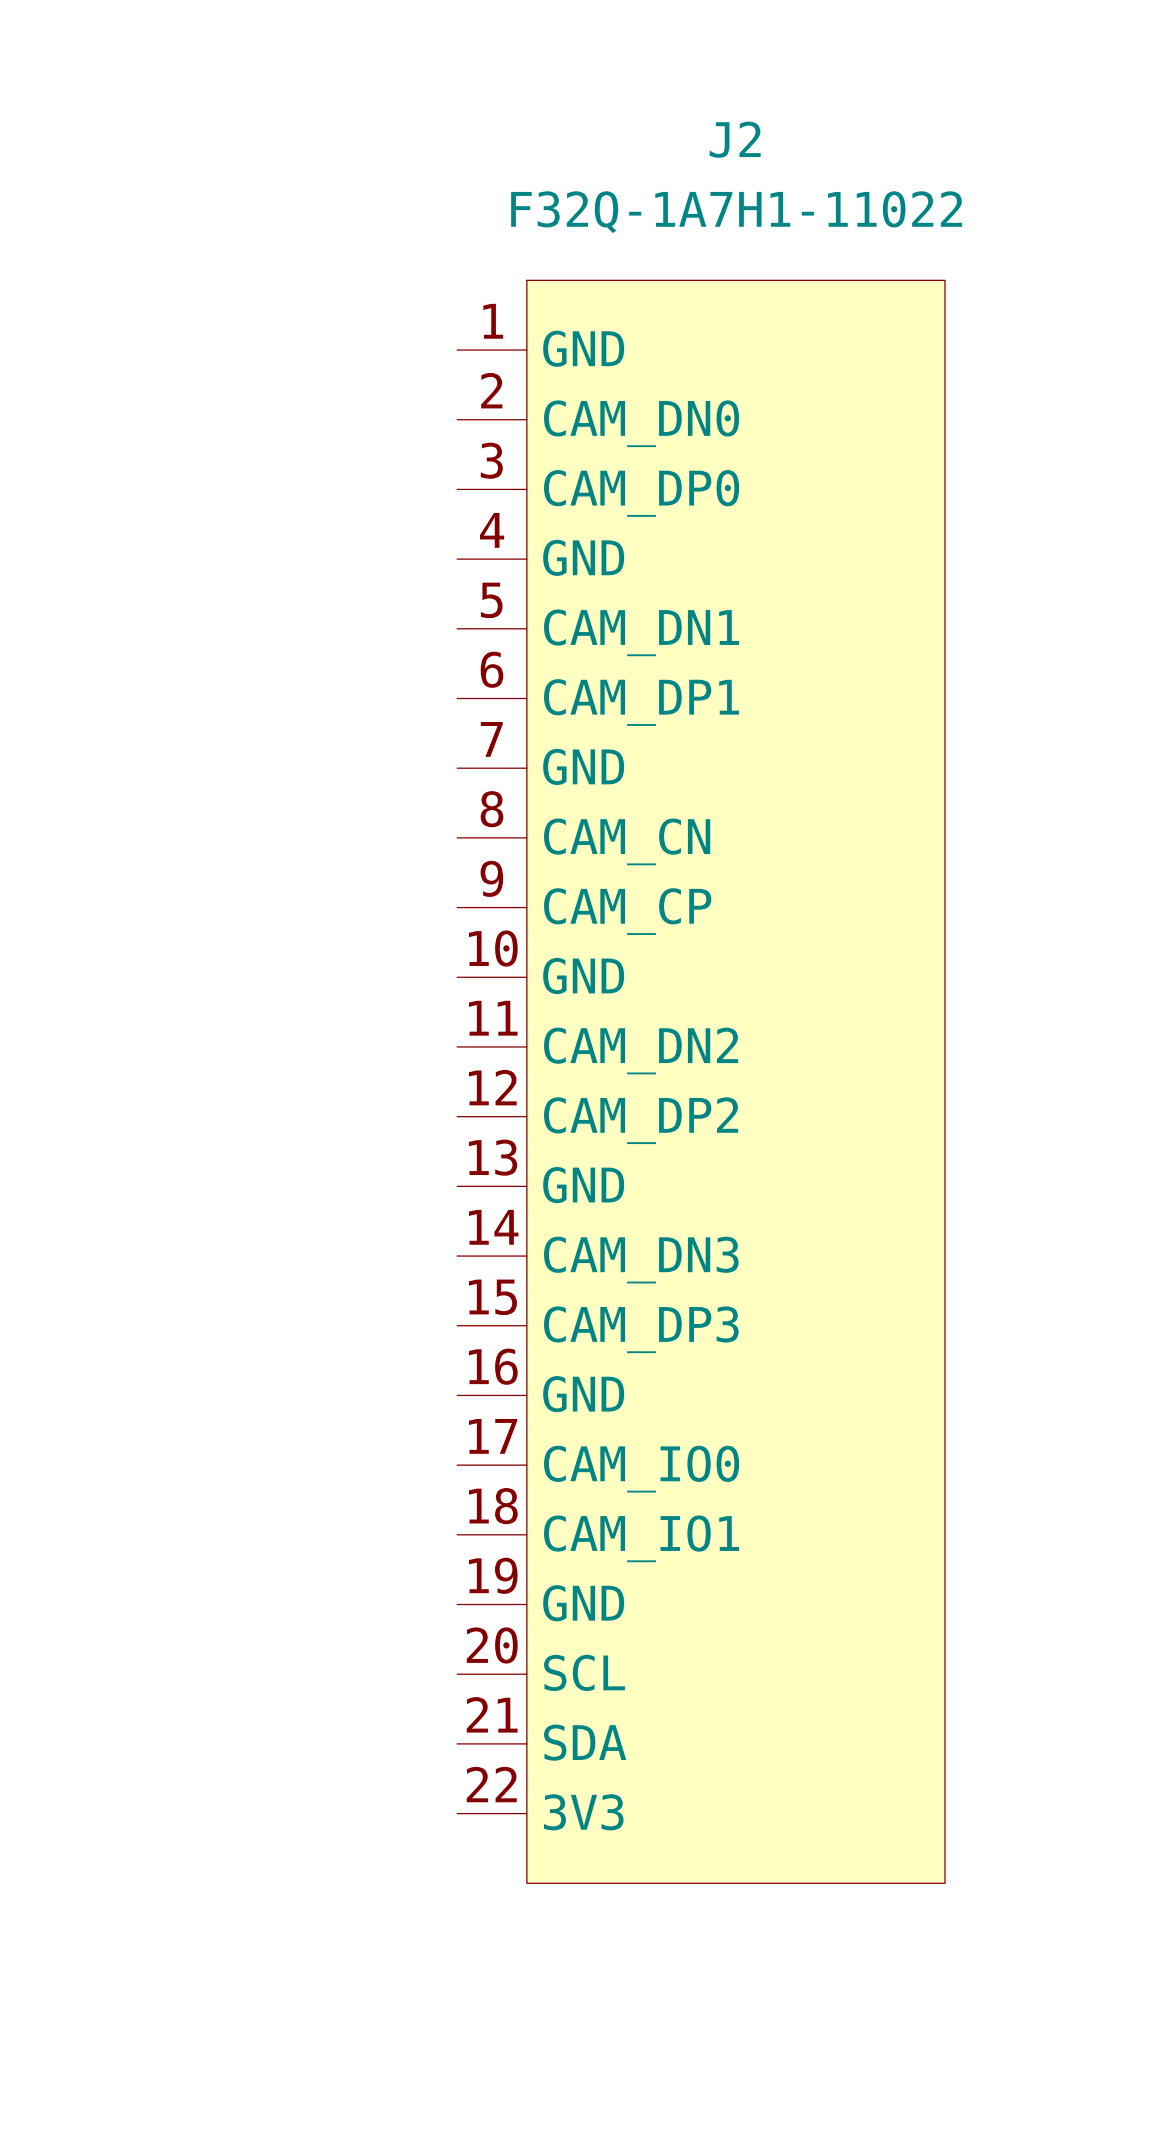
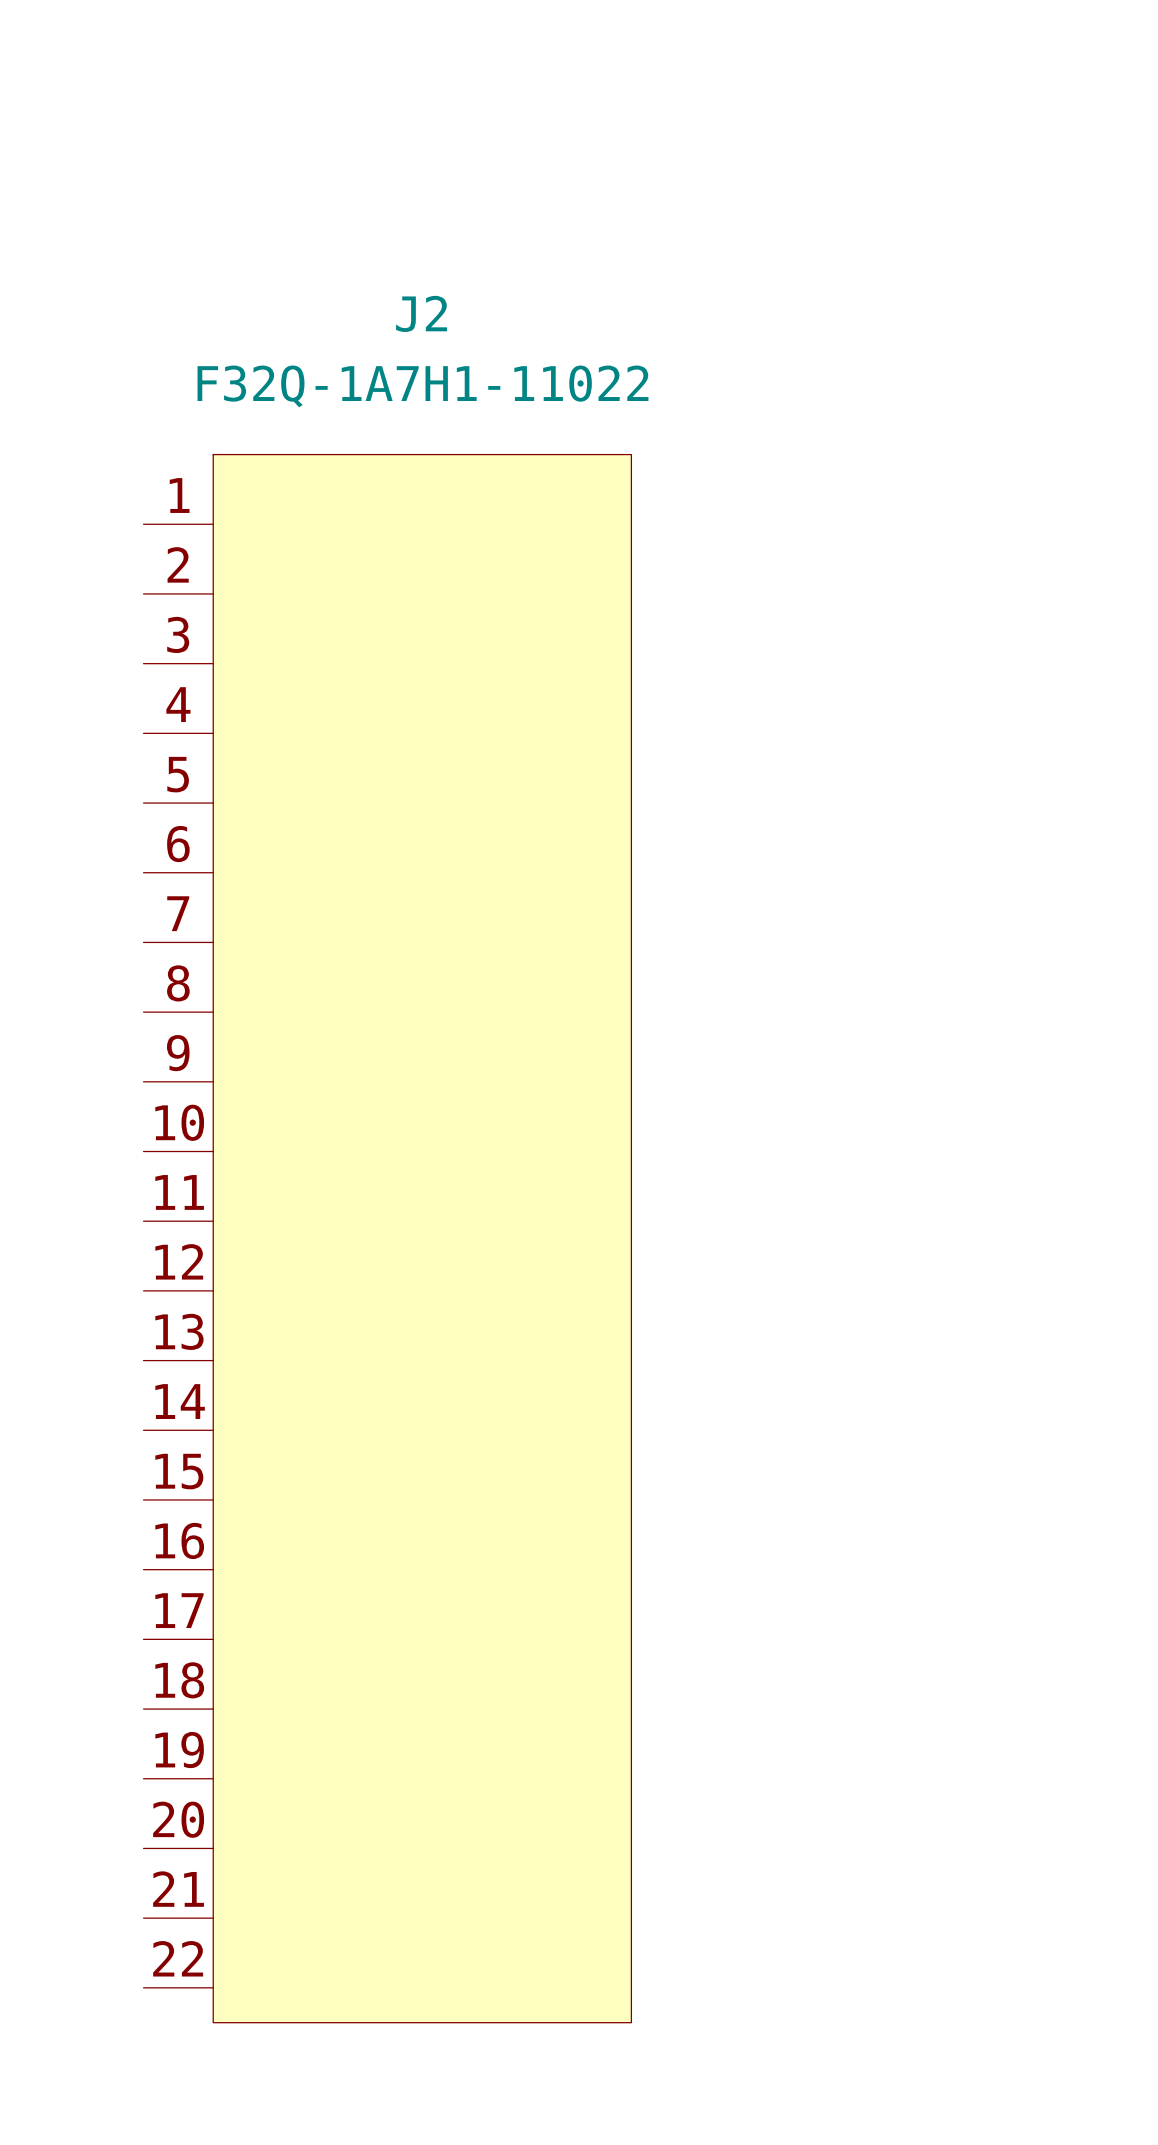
J2 symbol: [457, 280, 946, 1884] -> [143, 454, 632, 2023]

